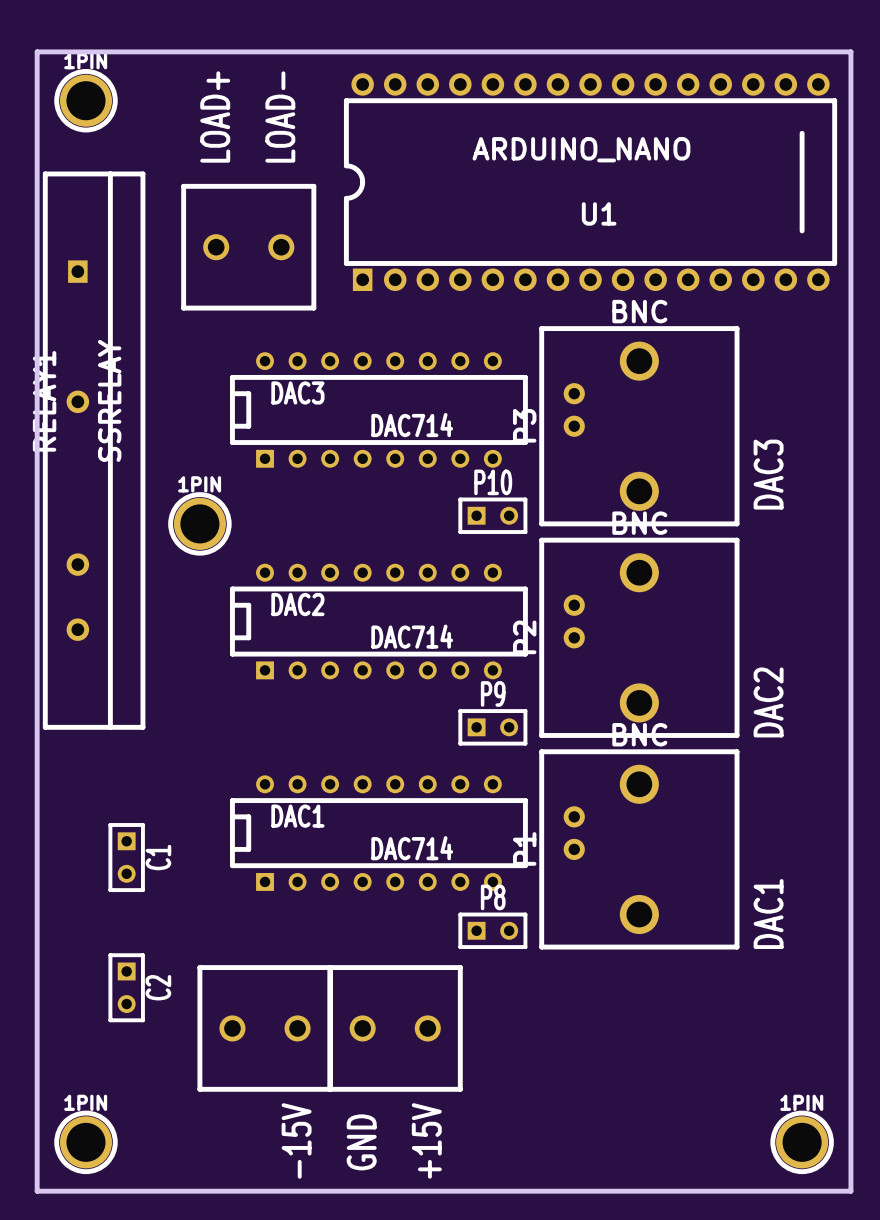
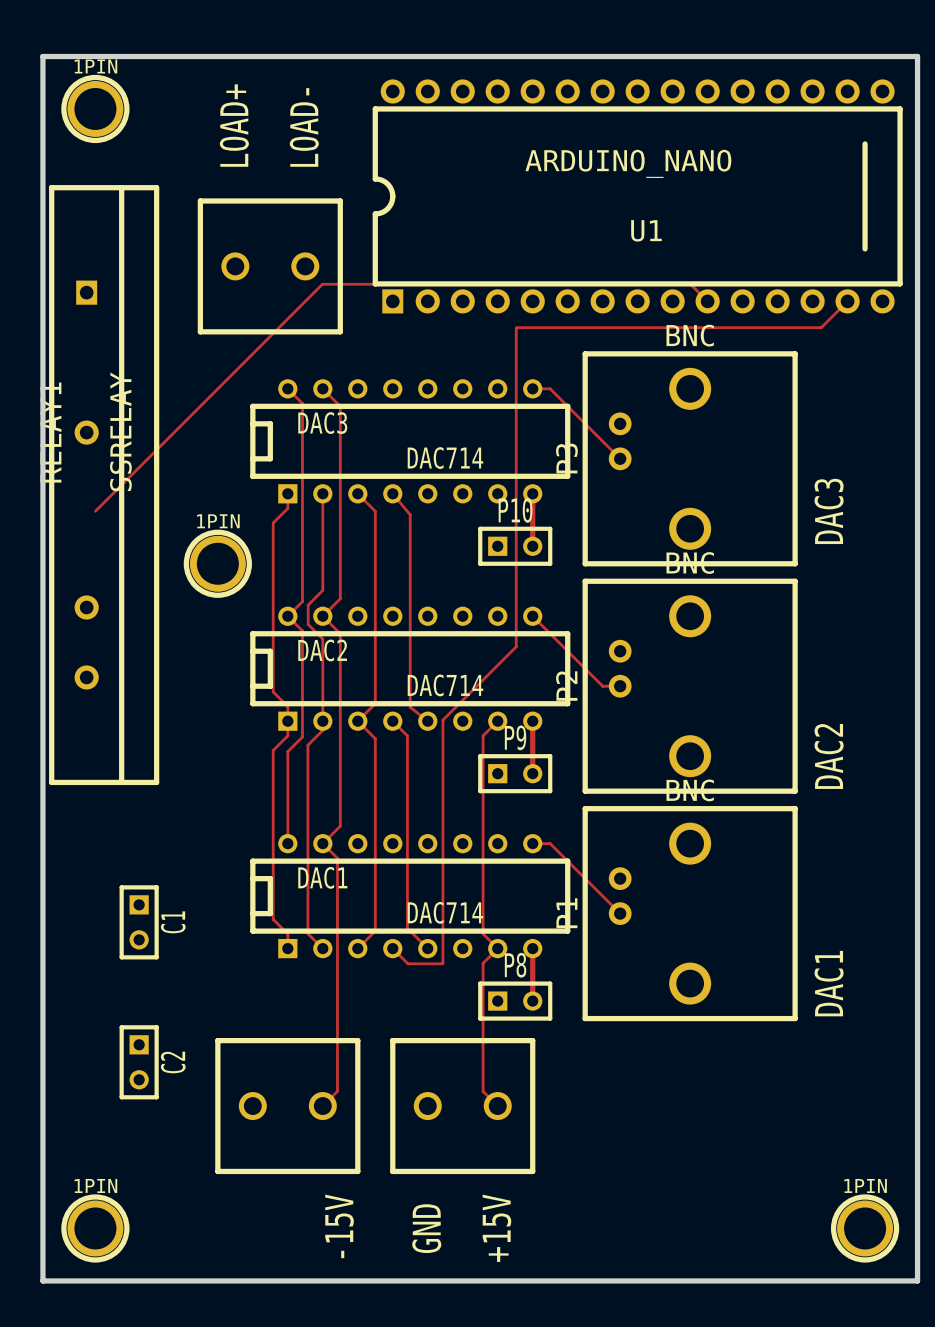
track: none -> (707, 301) (690, 284) (322, 284) (95, 511)
track: none -> (847, 301) (821, 327) (516, 328) (516, 646) (442, 720) (442, 963) (408, 963) (392, 948)
track: none -> (287, 388) (302, 403) (302, 601) (287, 616) (302, 630) (302, 737) (287, 751) (287, 843)
track: none -> (322, 388) (340, 406) (340, 598) (322, 616) (340, 633) (340, 826) (322, 843) (337, 858) (337, 1091) (322, 1106)
track: none -> (532, 388) (550, 388) (620, 458)
track: none -> (287, 493) (287, 508) (273, 523) (273, 691) (287, 706) (287, 735) (273, 750) (273, 919) (287, 933) (287, 948)
track: none -> (322, 493) (322, 590) (308, 605) (308, 624) (322, 639) (322, 730) (307, 745) (307, 933) (322, 948)
track: none -> (357, 493) (375, 511) (375, 703) (357, 721) (375, 738) (375, 931) (357, 948)
track: none -> (392, 493) (410, 514) (410, 707) (427, 721)
track: none -> (532, 493) (532, 546)
P10 position: (492, 515) -> (515, 546)
track: none -> (532, 616) (602, 686) (620, 686)
track: none -> (392, 721) (407, 735) (407, 928) (427, 948)
track: none -> (497, 721) (483, 735) (483, 933) (497, 948) (483, 963) (483, 1091) (497, 1106)
track: none -> (532, 721) (532, 773)
P9 position: (492, 727) -> (515, 773)
track: none -> (532, 843) (550, 843) (620, 913)
track: none -> (532, 948) (532, 1001)
P8 position: (492, 930) -> (515, 1001)
part position: (395, 1028) -> (462, 1106)
text position: -15V (296, 1140) -> -15V (339, 1226)
text position: +15V (426, 1140) -> +15V (496, 1228)
text position: GND (361, 1142) -> GND (426, 1228)

